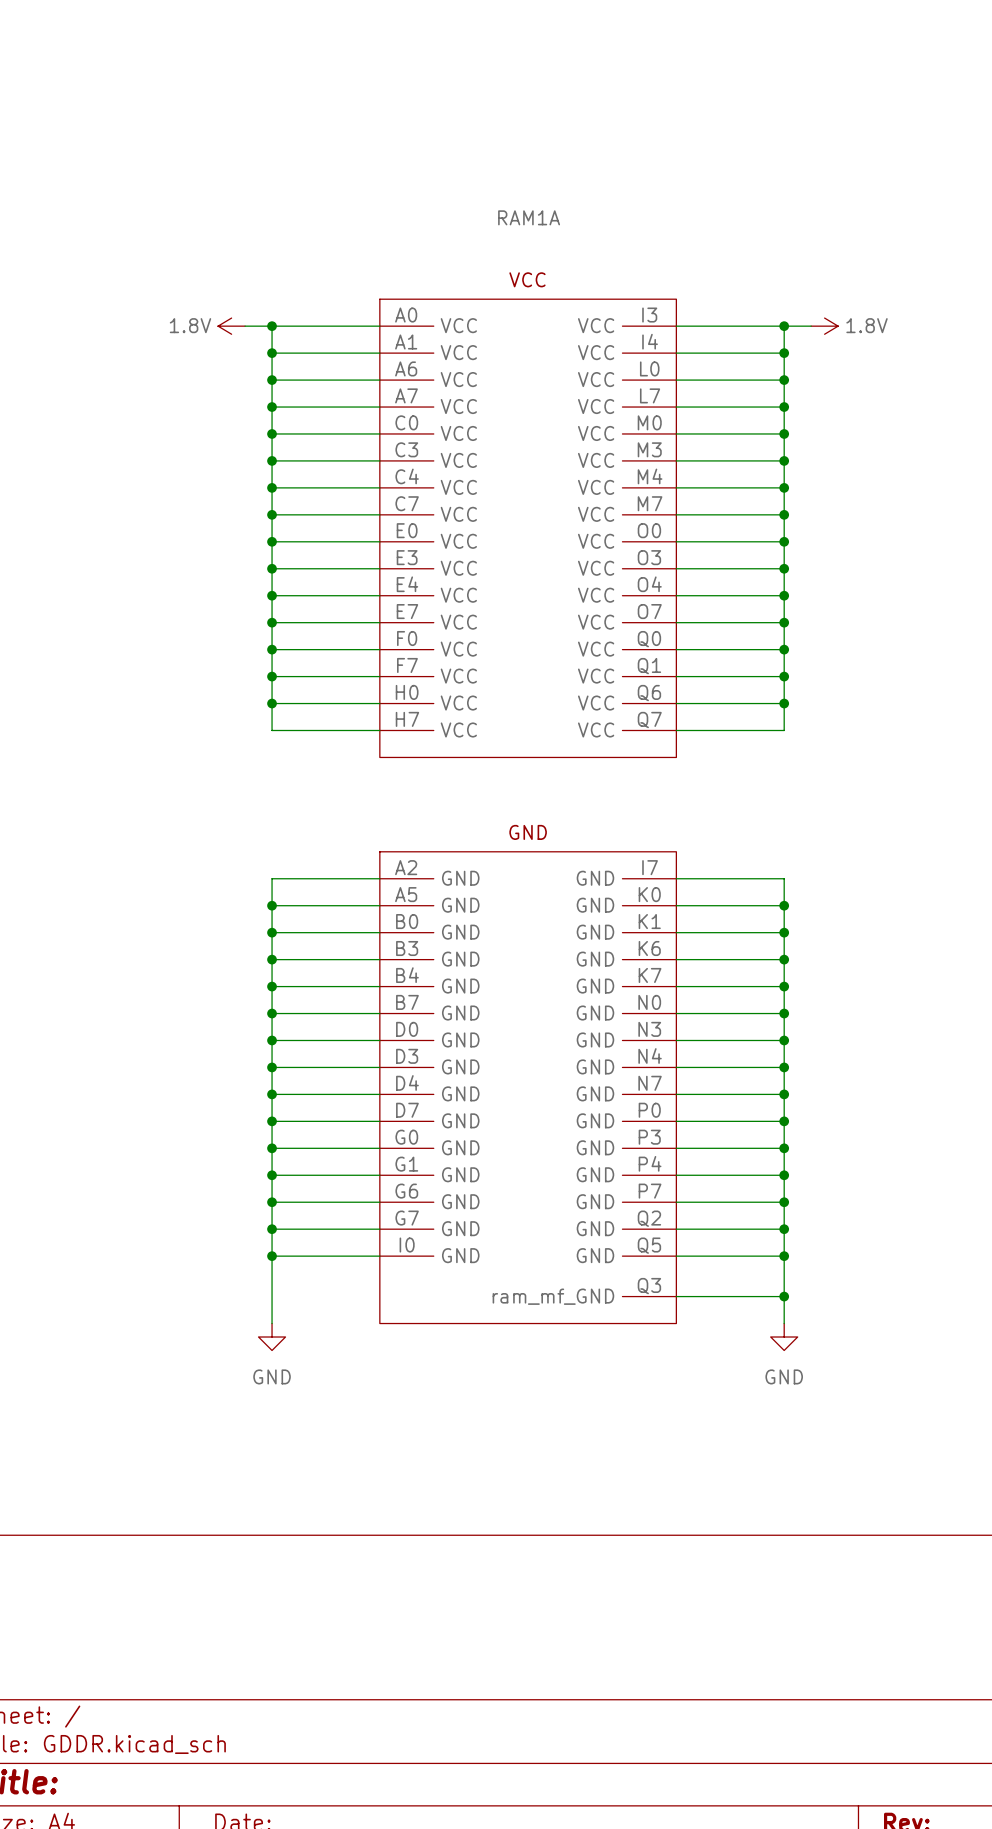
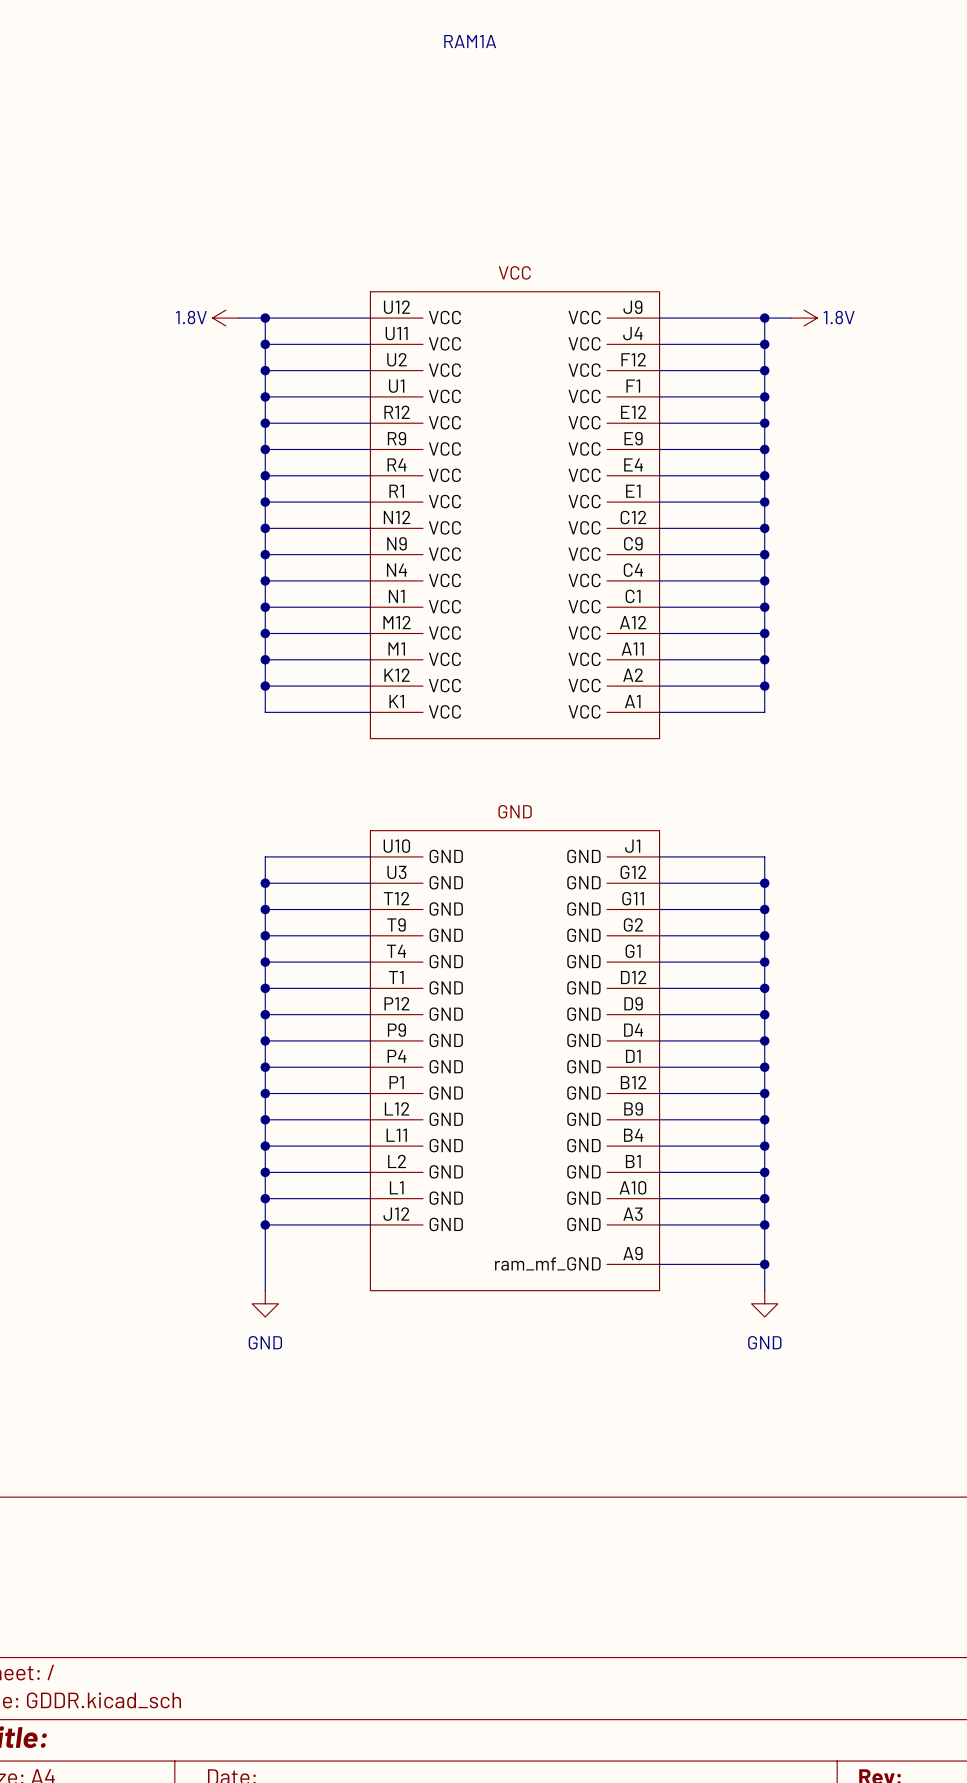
RAM1A name position: RAM1A (529, 217) -> RAM1A (470, 41)
RAM1A symbol: [379, 299, 677, 1324] -> [370, 291, 660, 1291]

